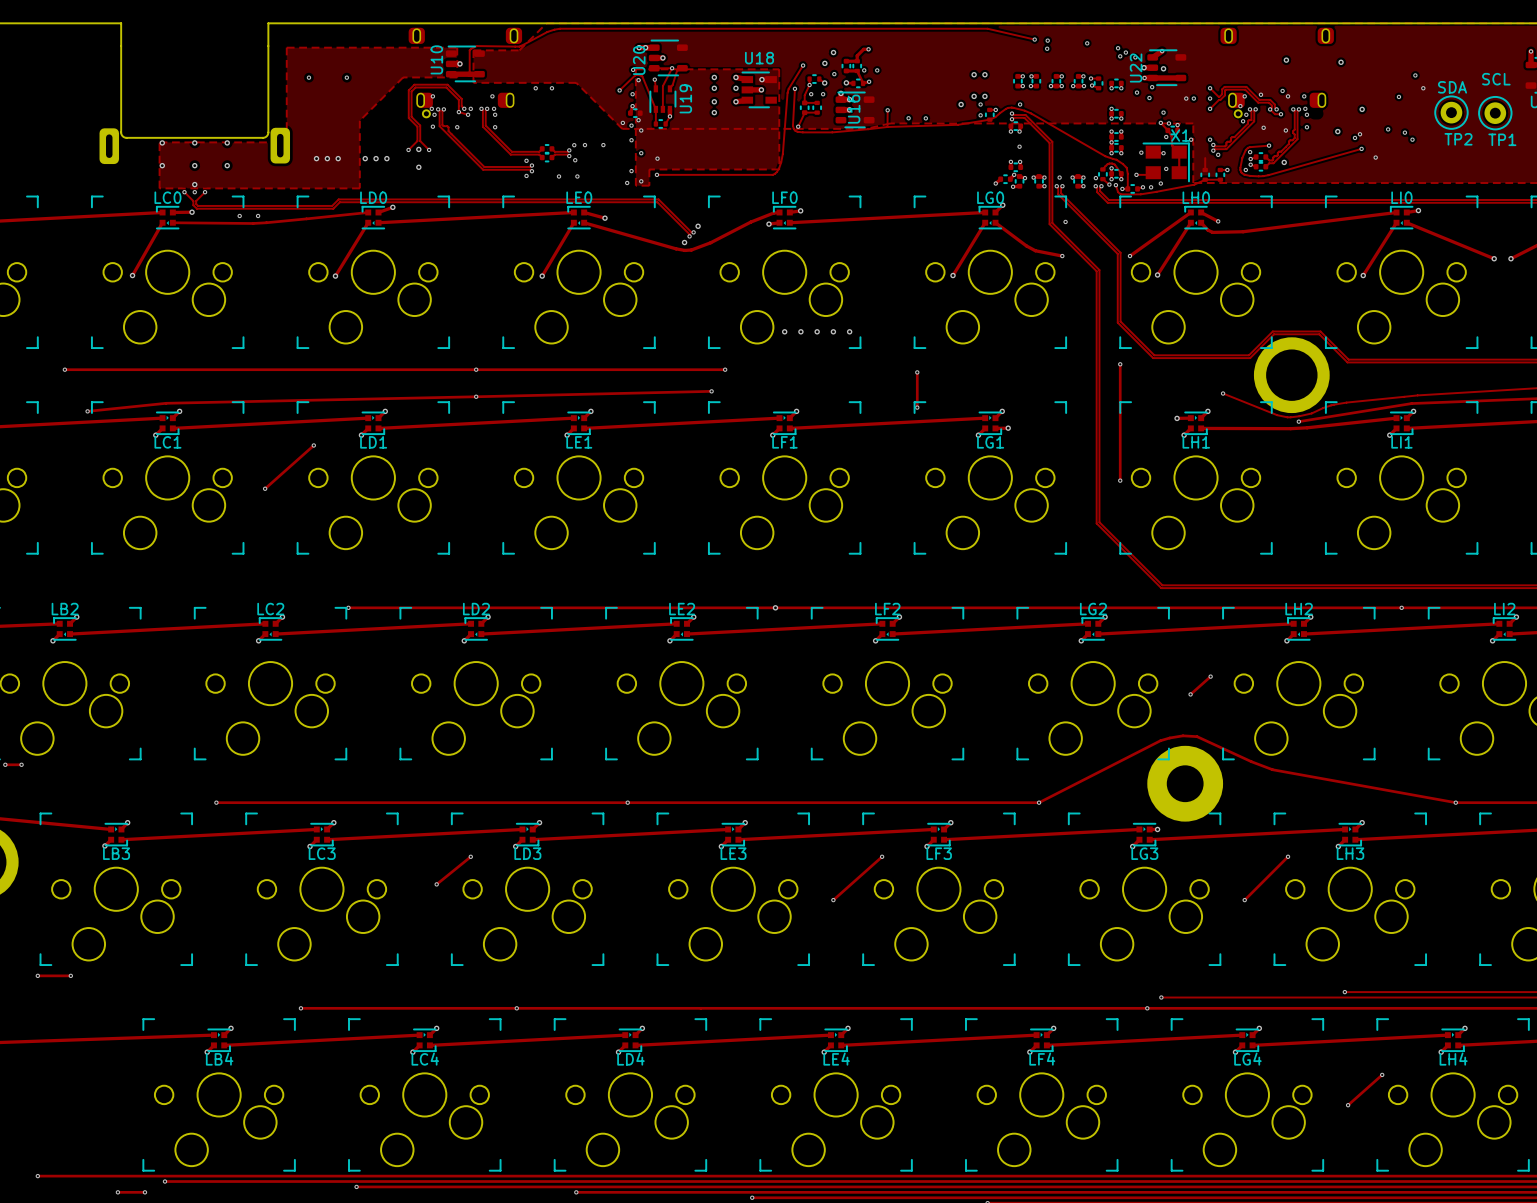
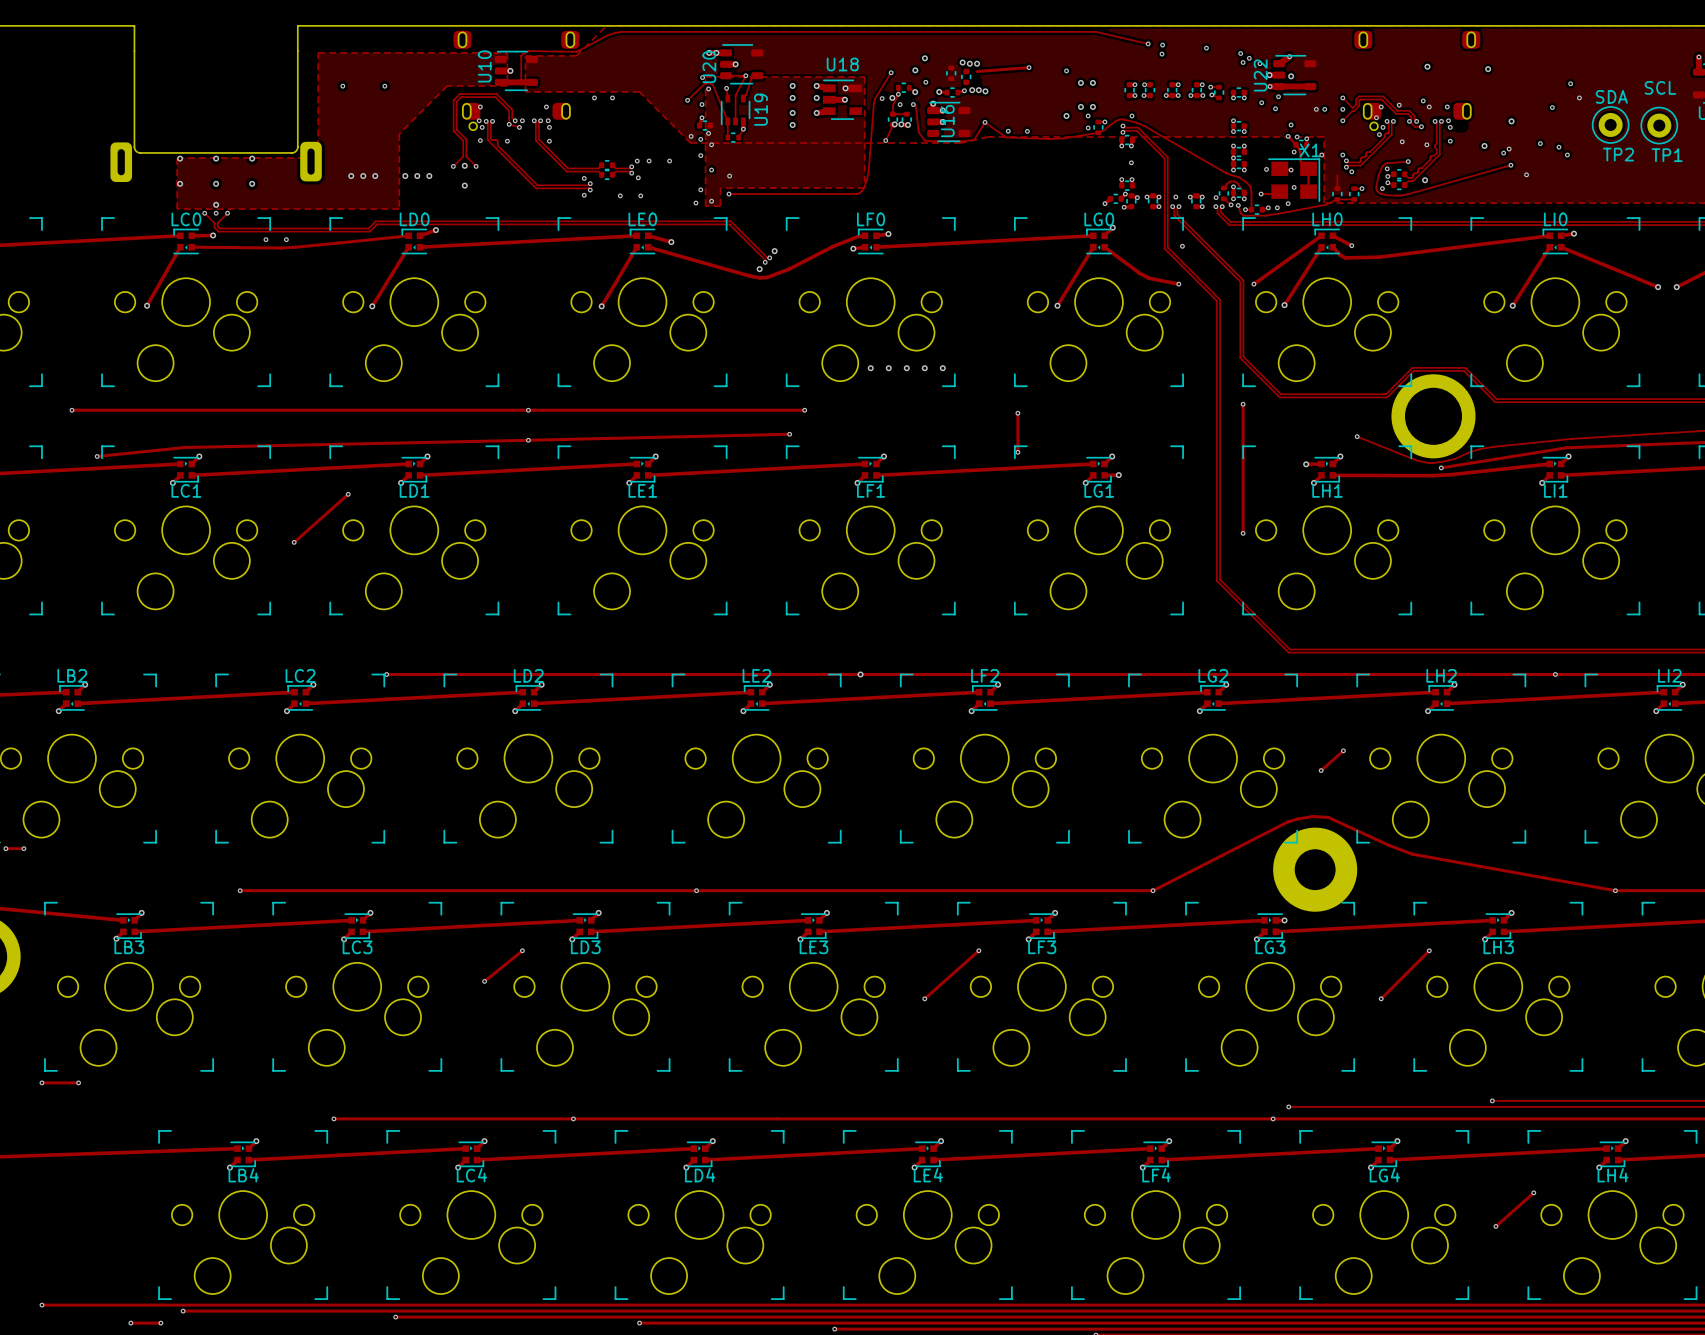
track: (868, 49) (863, 49) (857, 55) (857, 61) (846, 60) -> none
via: (868, 49) -> none
via: none -> (962, 62)
via: none -> (969, 63)
via: none -> (977, 63)
track: none -> (1029, 67) (977, 71)
via: none -> (1029, 67)
via: none -> (1066, 70)
part position: (846, 66) -> (966, 76)
track: (846, 70) (857, 70) (863, 83) -> none
via: (864, 70) -> none
via: (877, 70) -> none
via: none -> (972, 90)
via: none -> (978, 90)
via: none -> (985, 91)
track: (794, 88) (792, 125) (797, 131) (832, 132) (887, 126) -> none
via: none -> (892, 97)
track: (887, 110) (887, 126) -> none
track: (804, 112) (817, 112) -> none
via: none -> (894, 124)
via: none -> (901, 124)
via: none -> (907, 124)
track: (945, 125) (887, 126) -> (1048, 138) (1006, 137) (985, 122) (974, 139) (924, 140) (918, 132) (915, 105)

